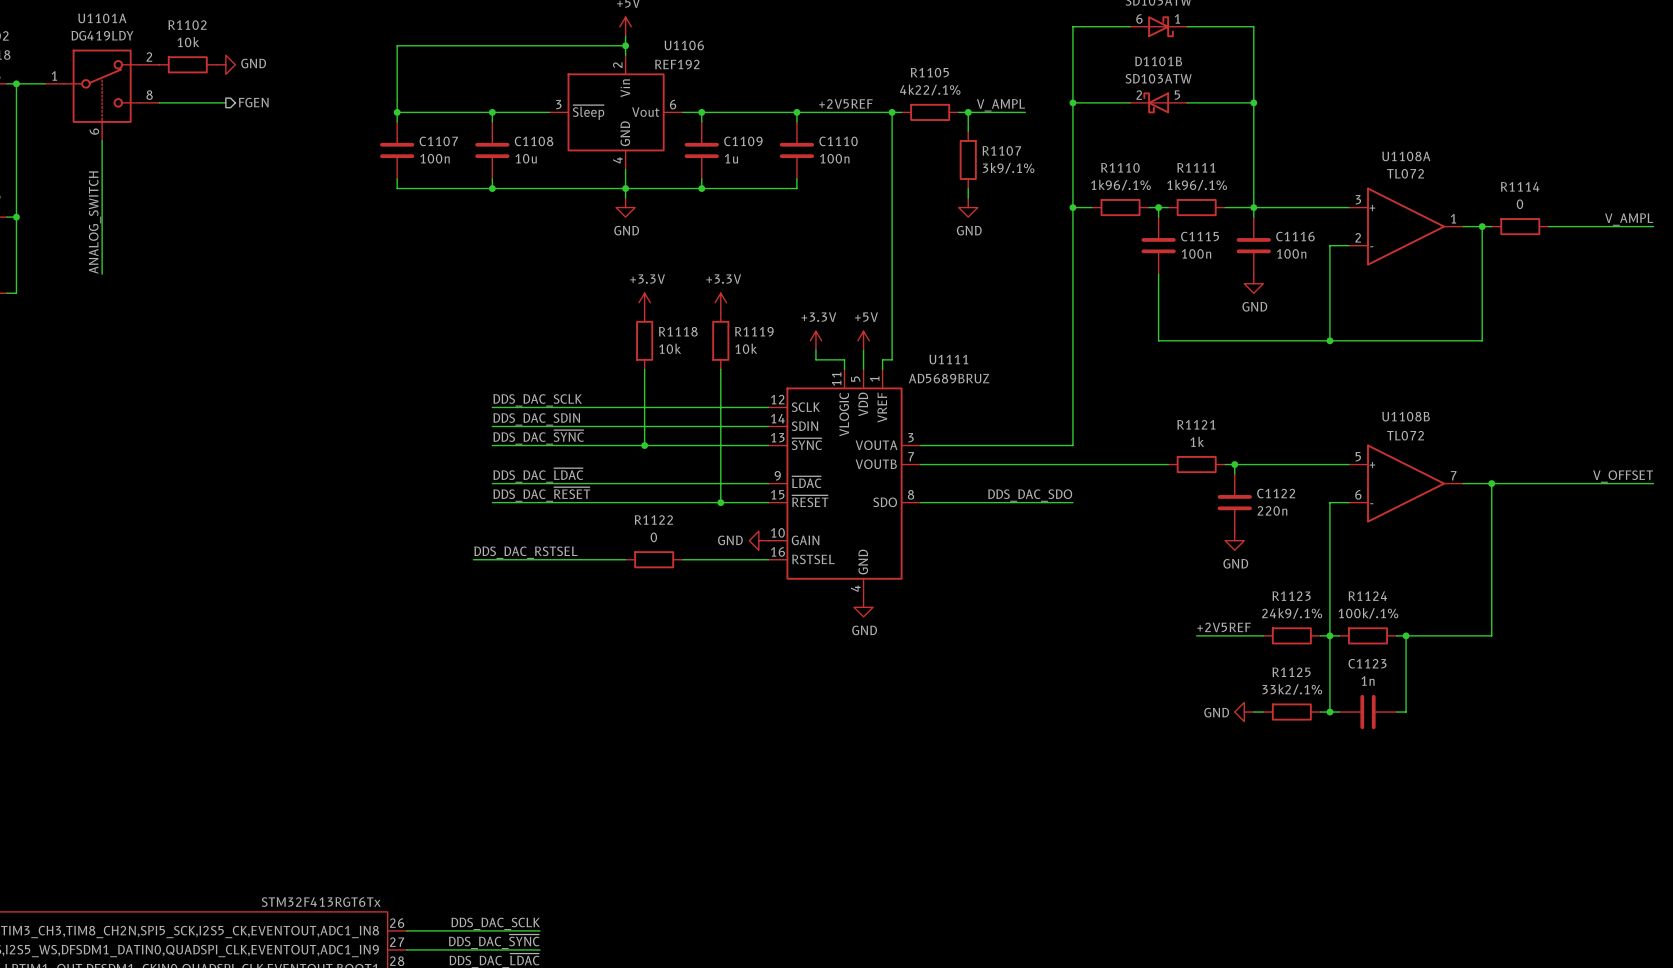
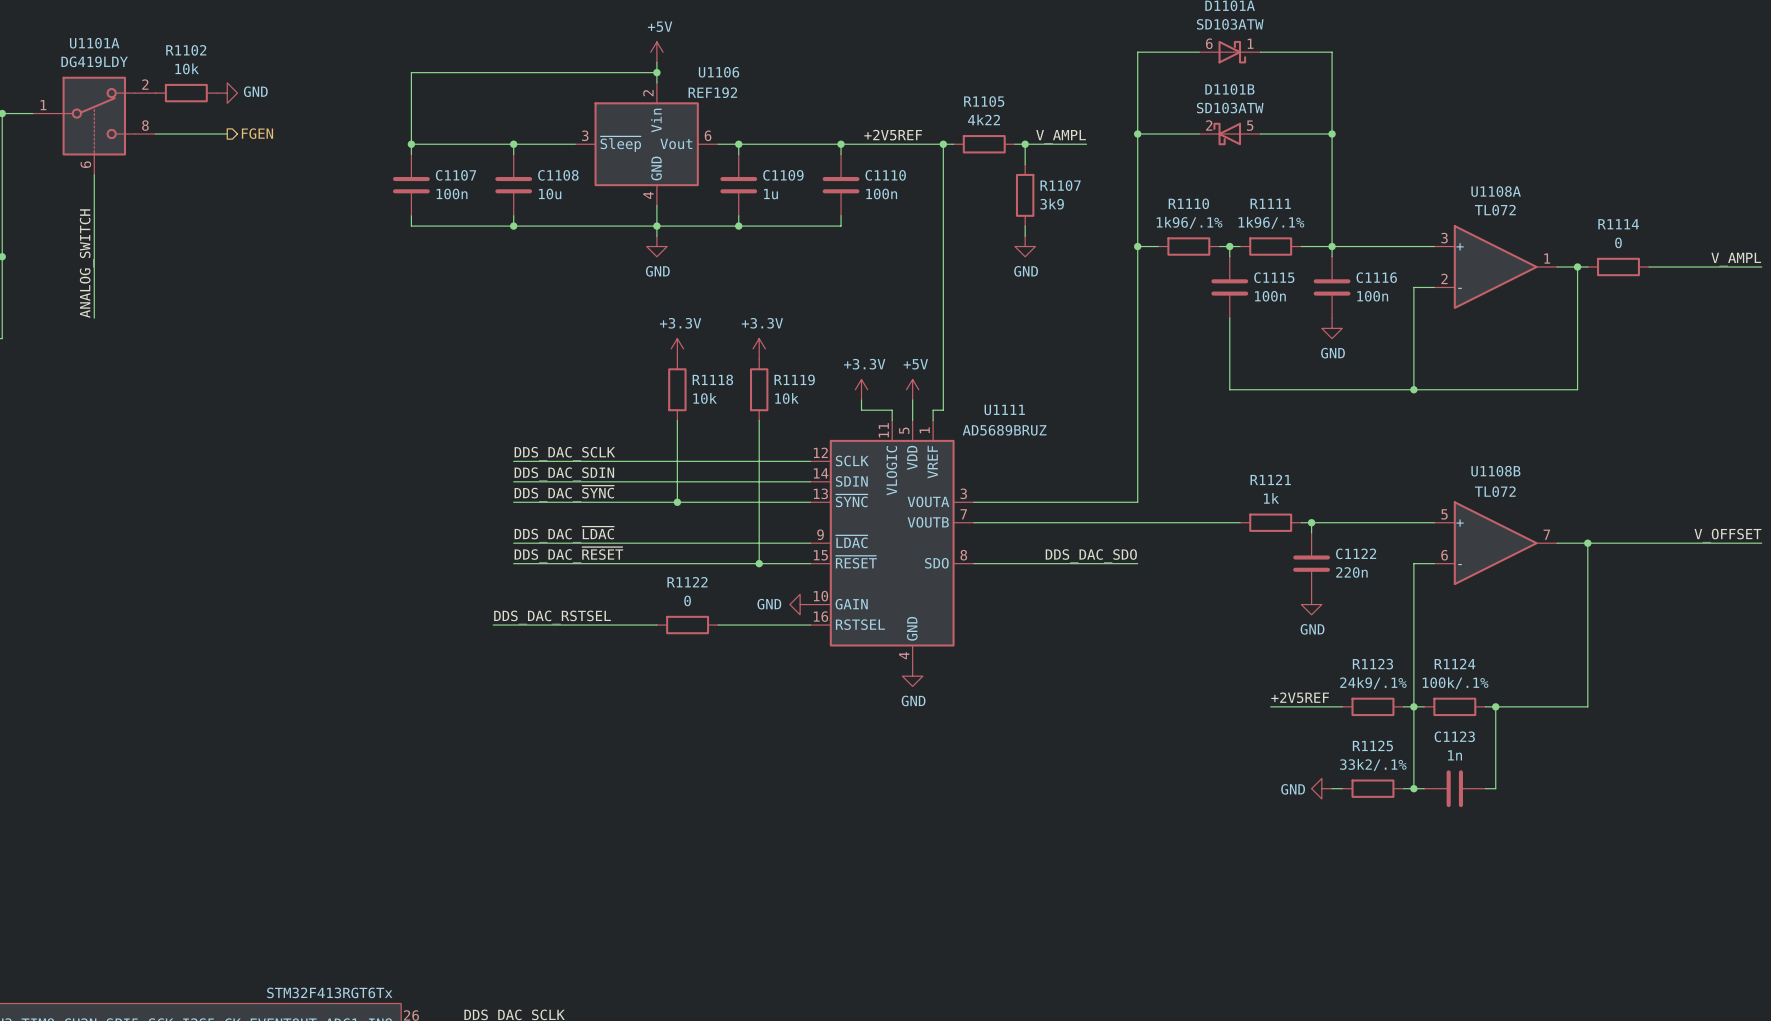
R1105 value: 4k22/.1% (930, 89) -> 4k22 (984, 119)
R1107 value: 3k9/.1% (1008, 168) -> 3k9 (1052, 204)

